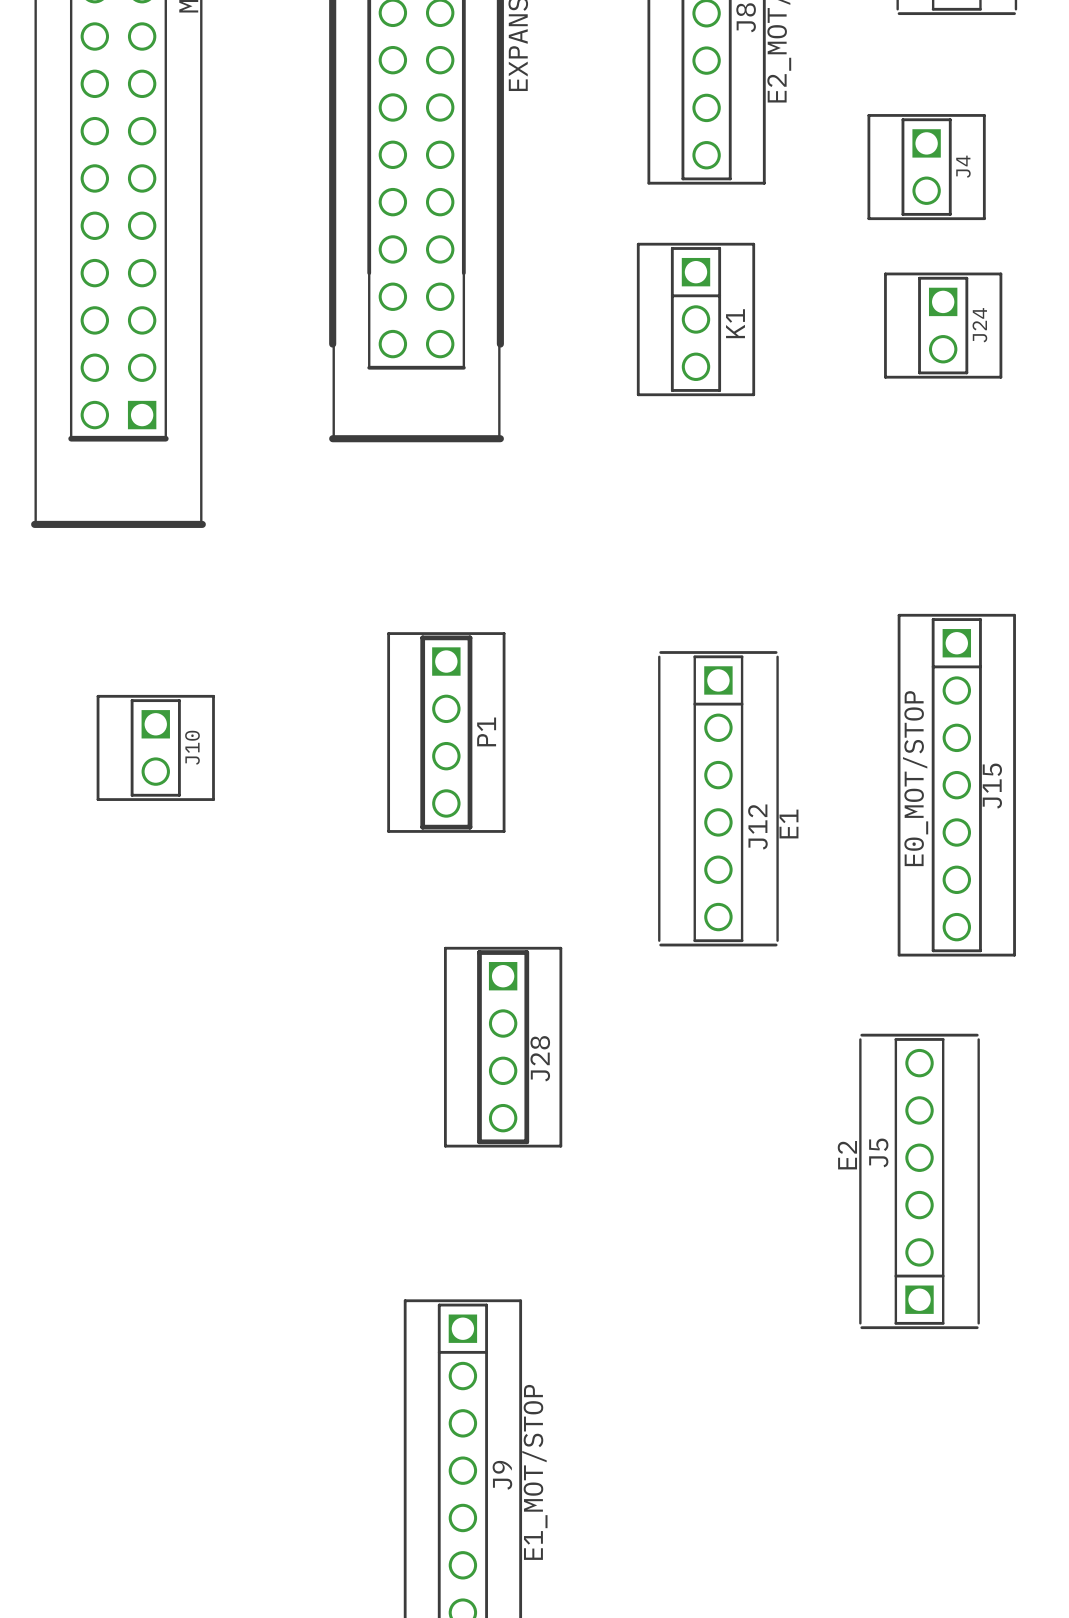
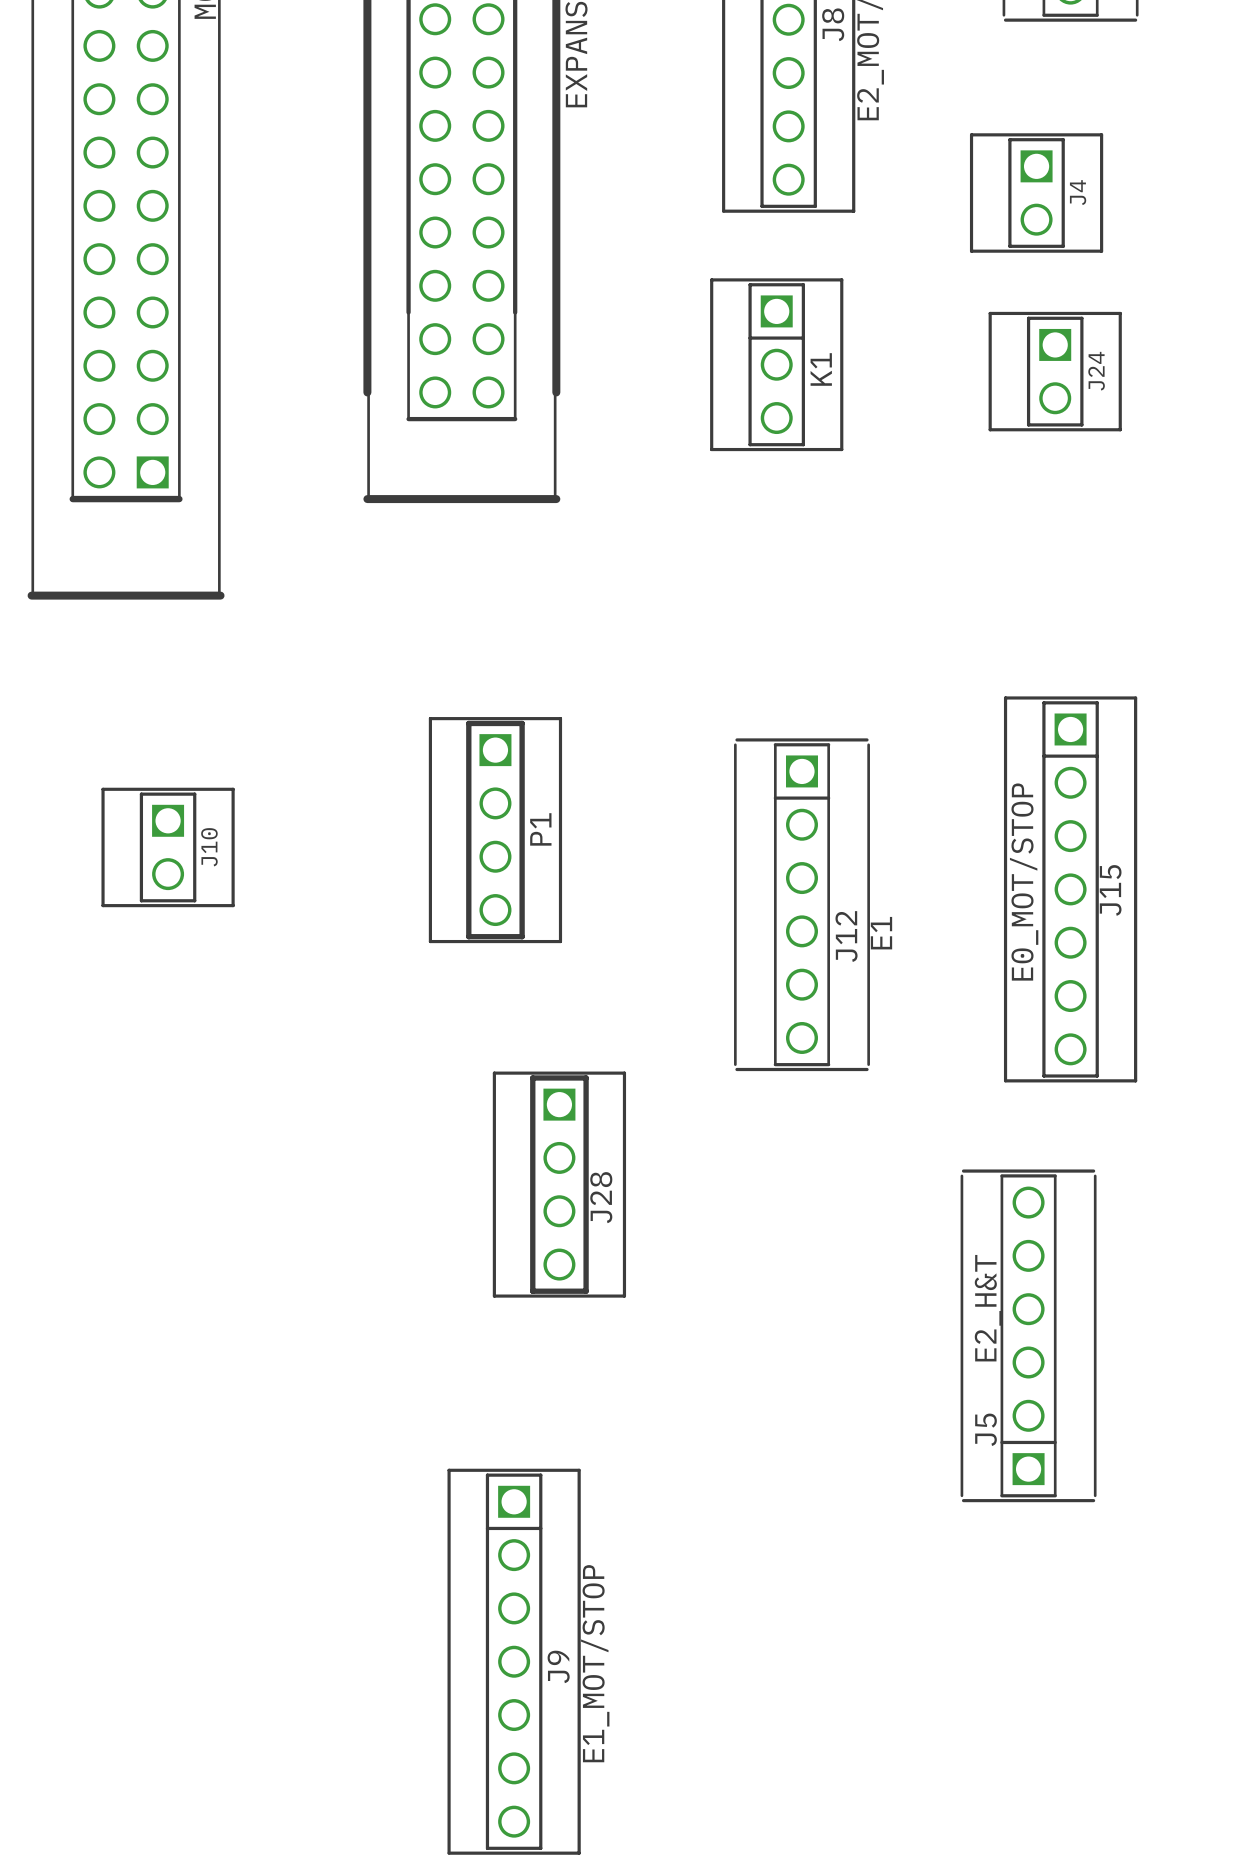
J5 name position: J5 (878, 1152) -> J5 (986, 1429)
J5 value: E2 (847, 1155) -> E2_H&T (988, 1308)

